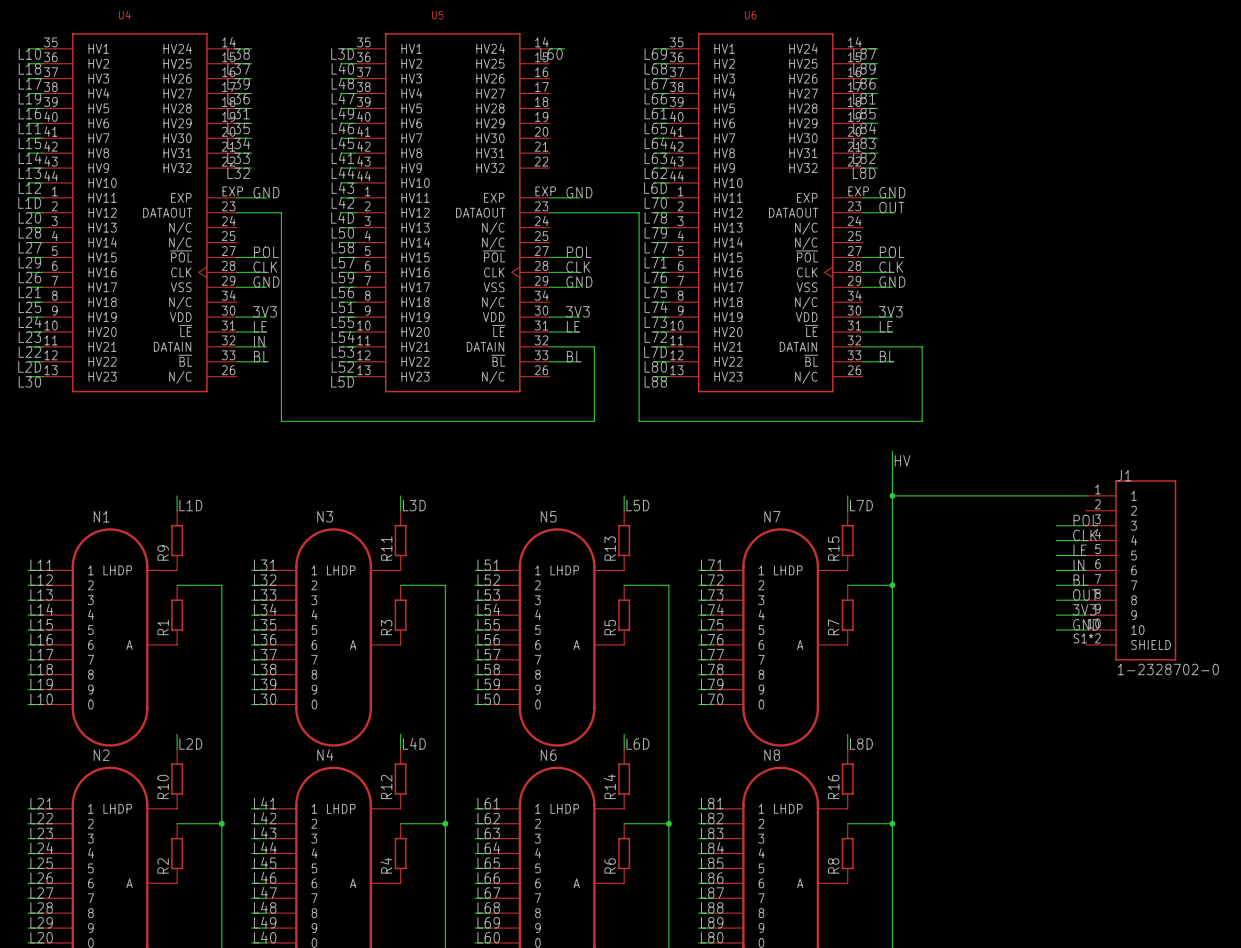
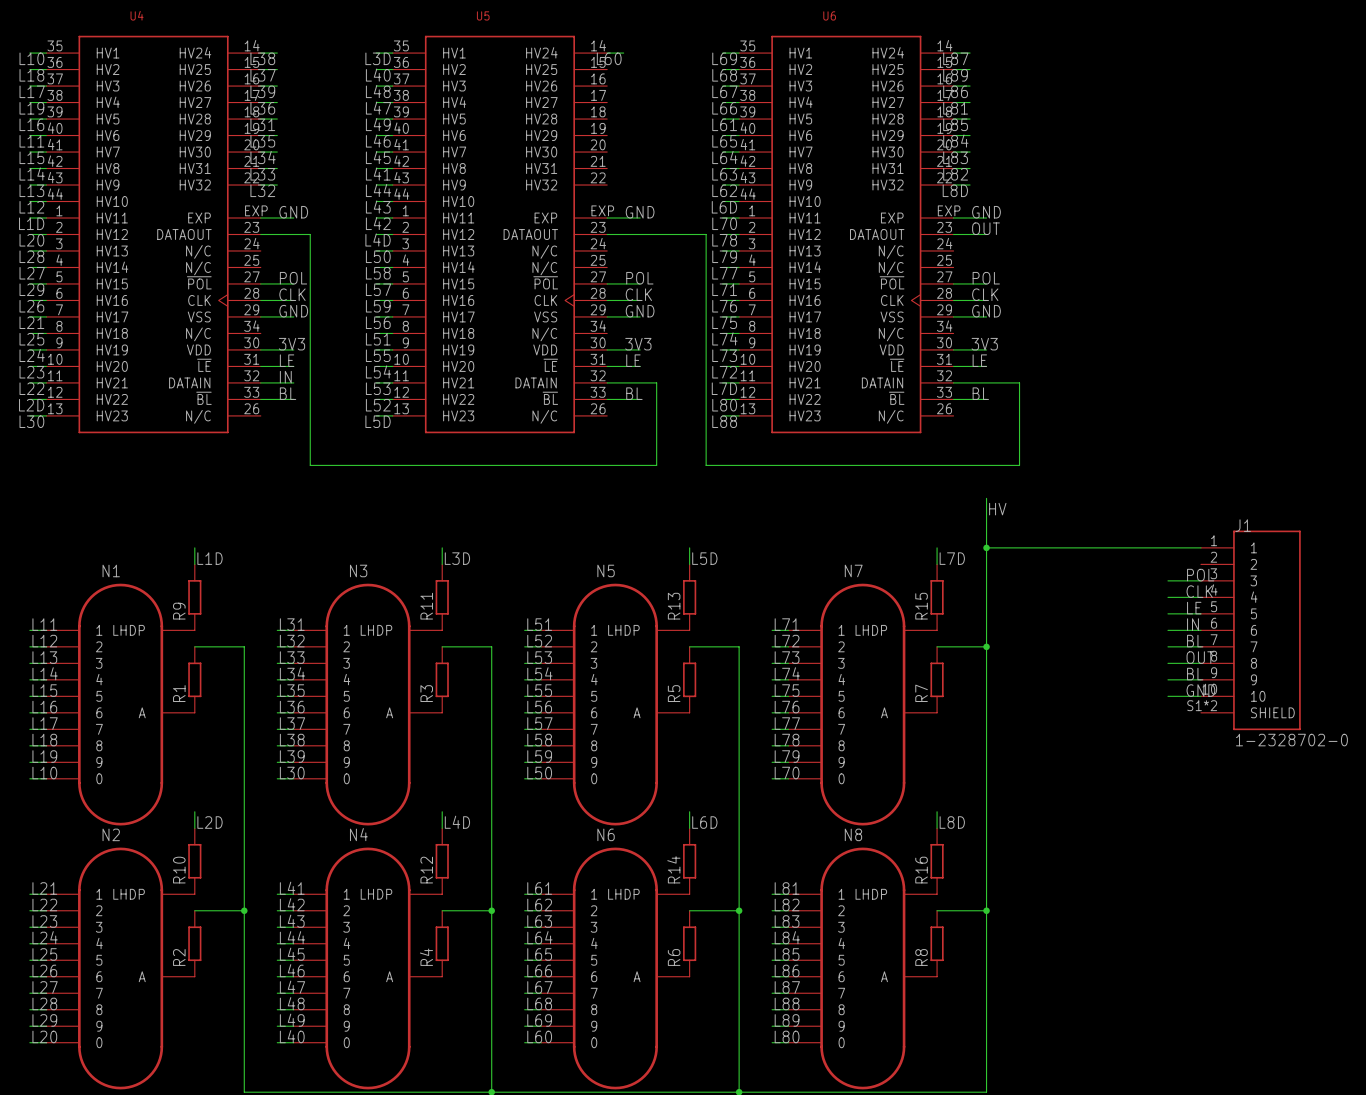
label: 3V3 (1084, 609) -> BL (1195, 674)

